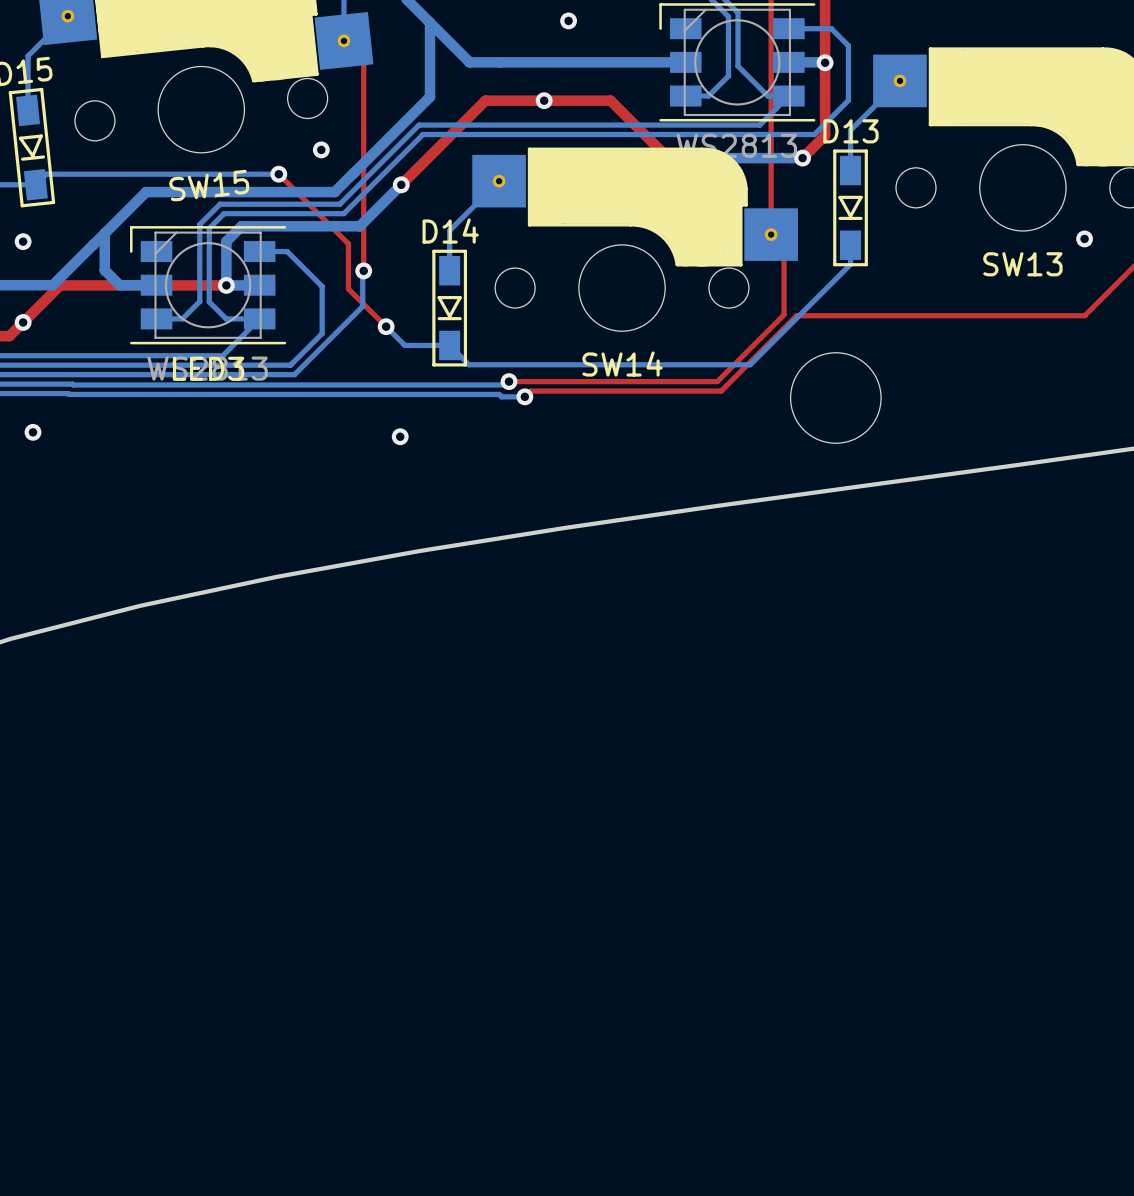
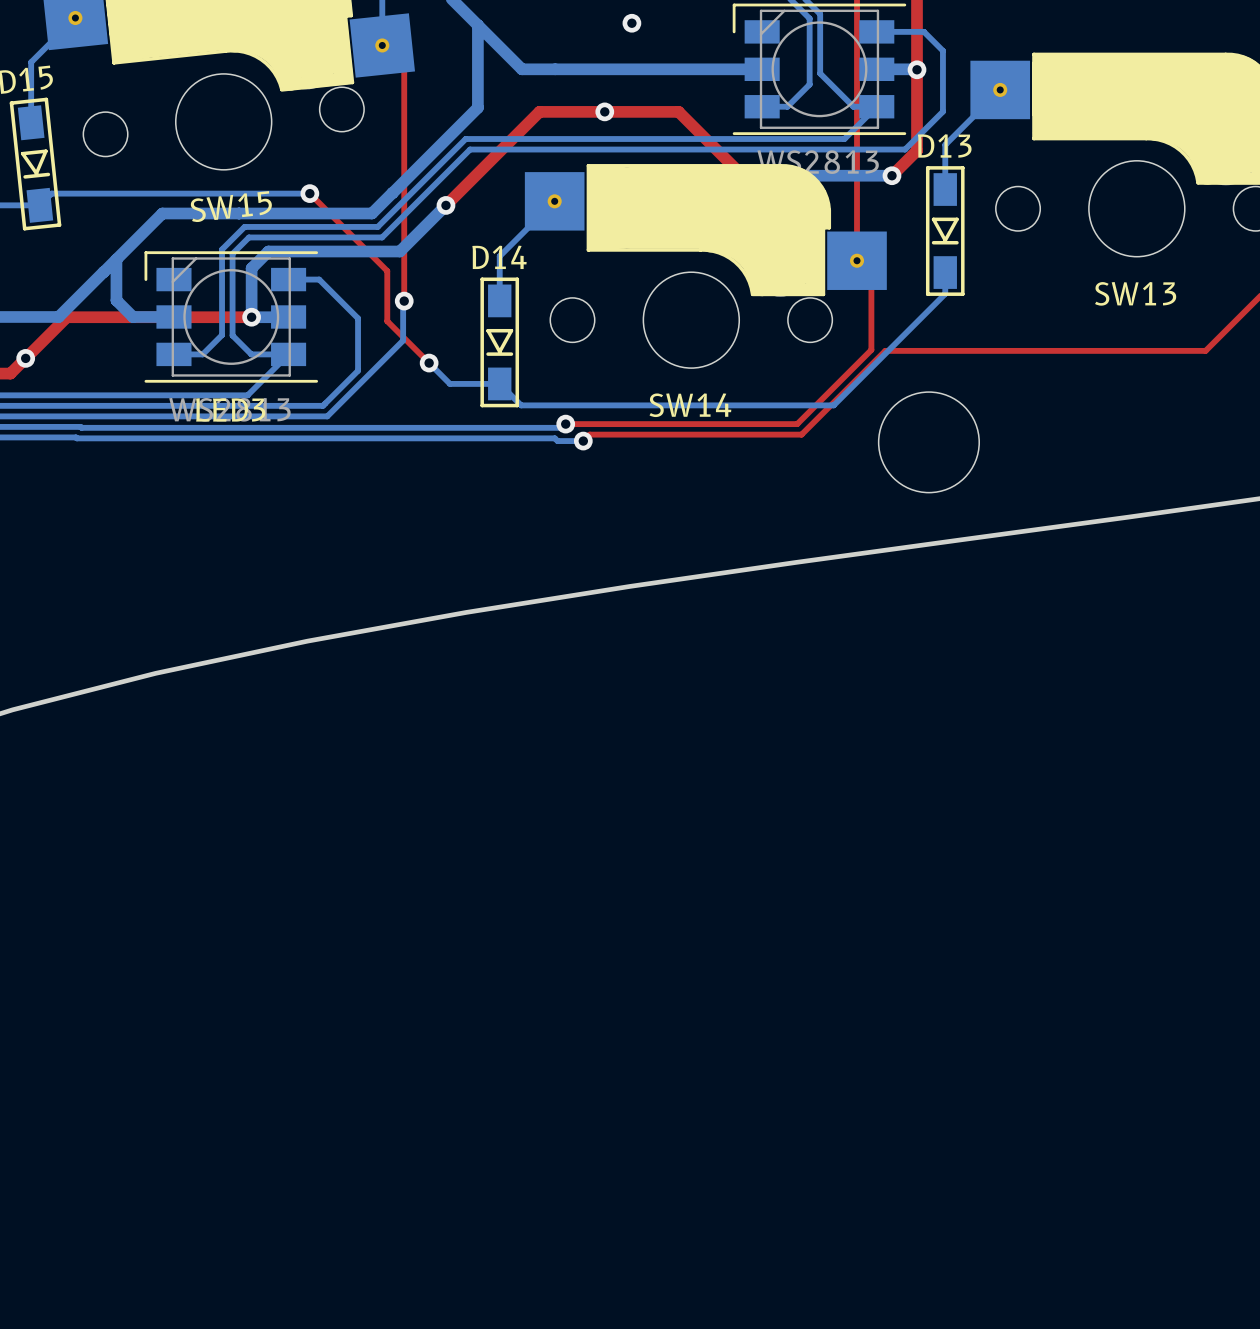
via: (321, 149) -> none
via: (1084, 238) -> none
via: (23, 241) -> none
via: (33, 432) -> none
via: (400, 436) -> none

